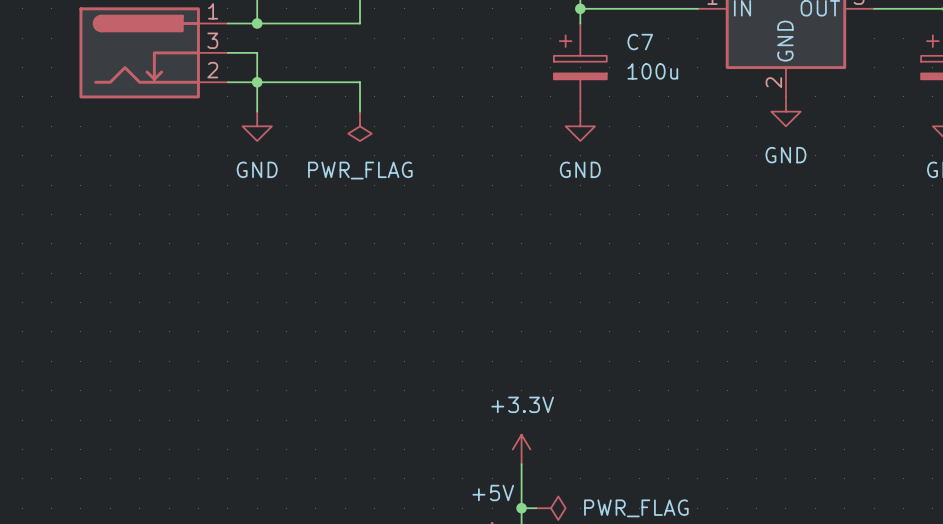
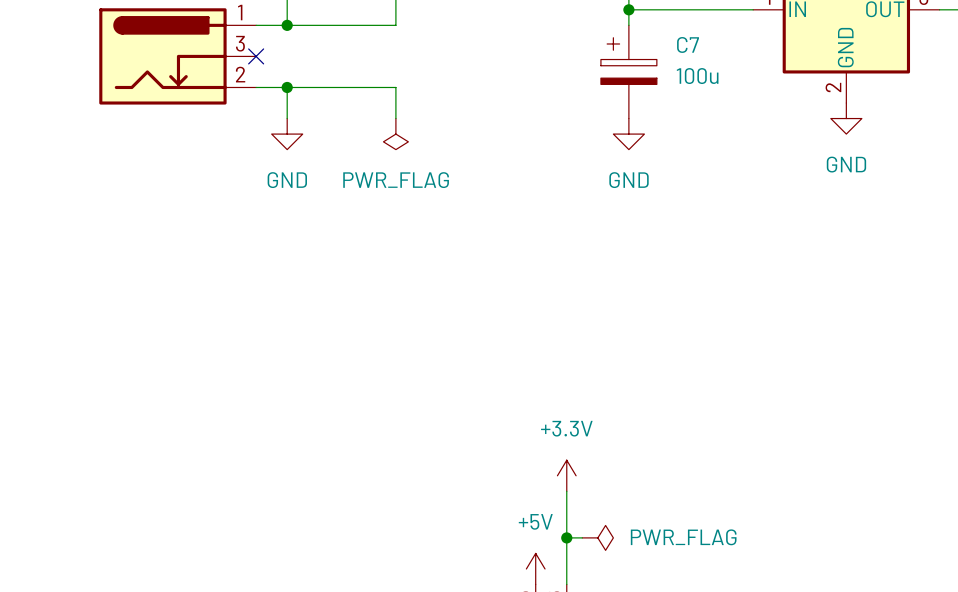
wire: (227, 52) (257, 52) (257, 82) -> none
no-connect mark: none -> (256, 56)

